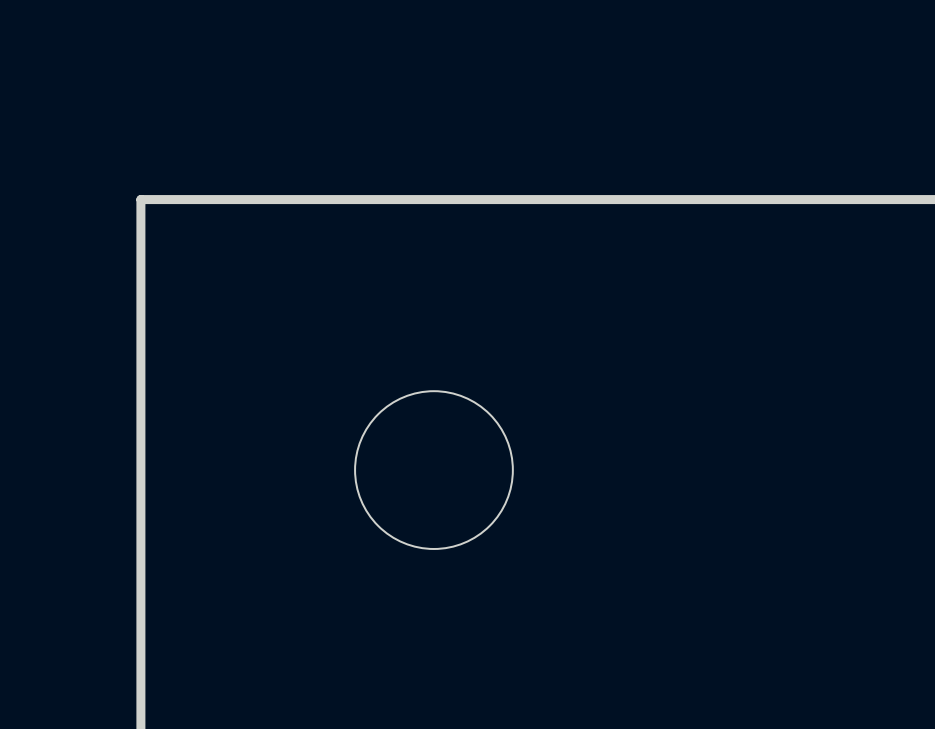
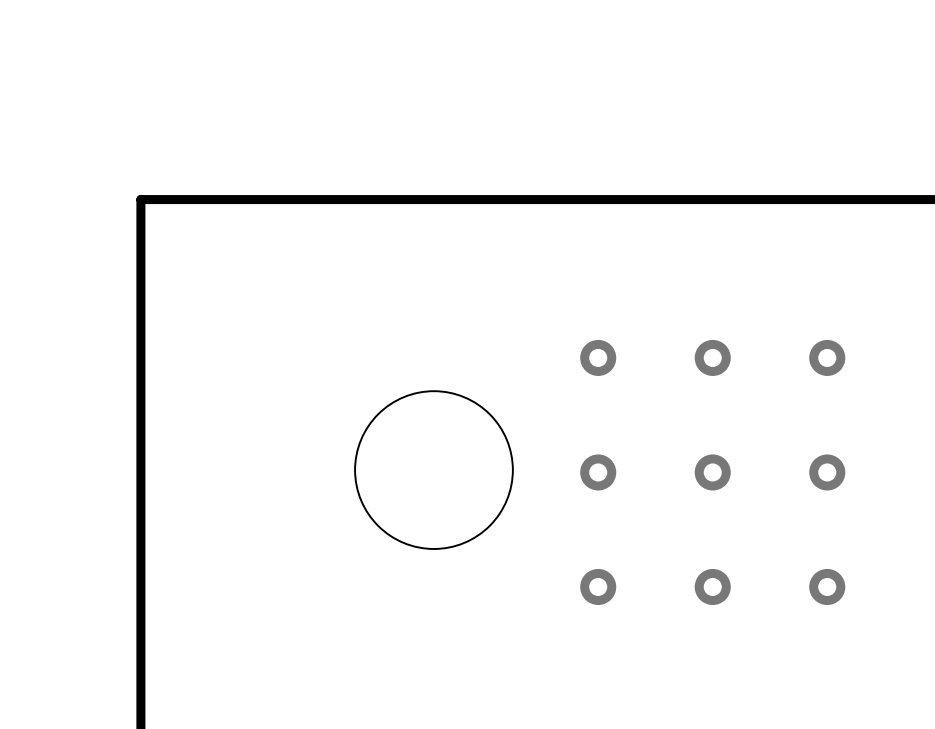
via: none -> (598, 357)
via: none -> (712, 357)
via: none -> (827, 357)
via: none -> (598, 472)
via: none -> (712, 472)
via: none -> (827, 472)
via: none -> (598, 586)
via: none -> (712, 586)
via: none -> (827, 586)

